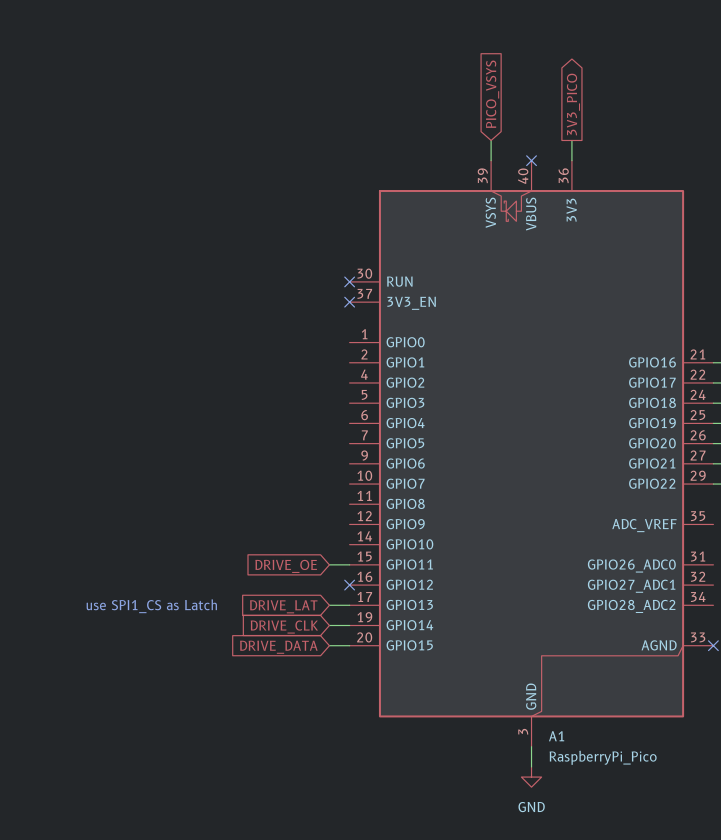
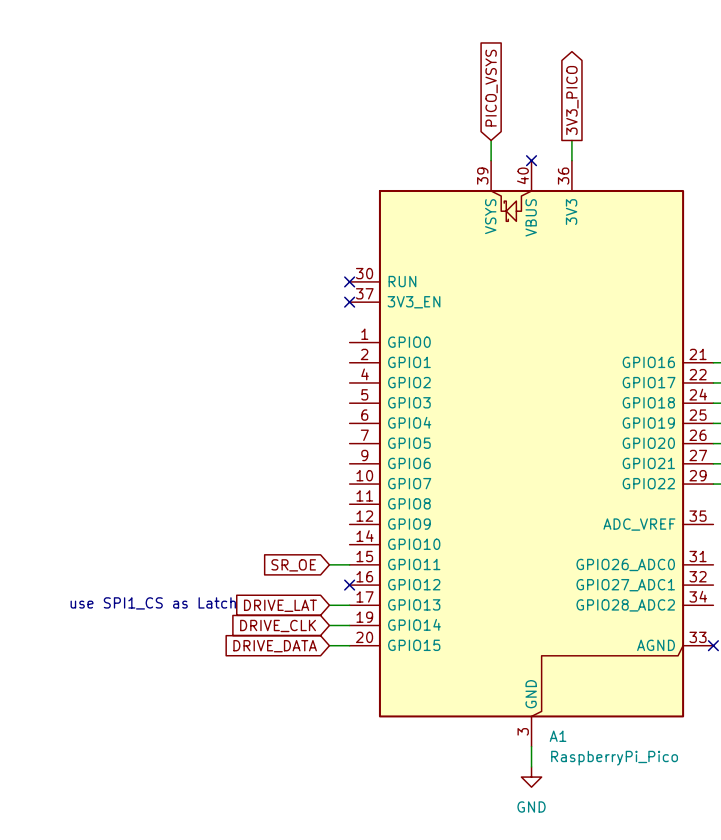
global label: DRIVE_OE (286, 566) -> SR_OE (293, 565)
text position: use SPI1_CS as Latch (151, 606) -> use SPI1_CS as Latch (153, 603)

